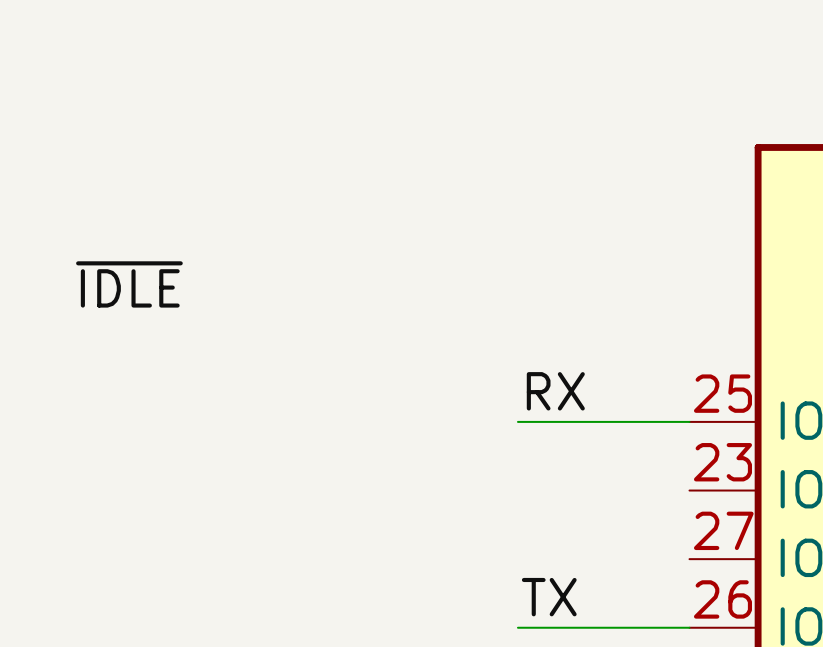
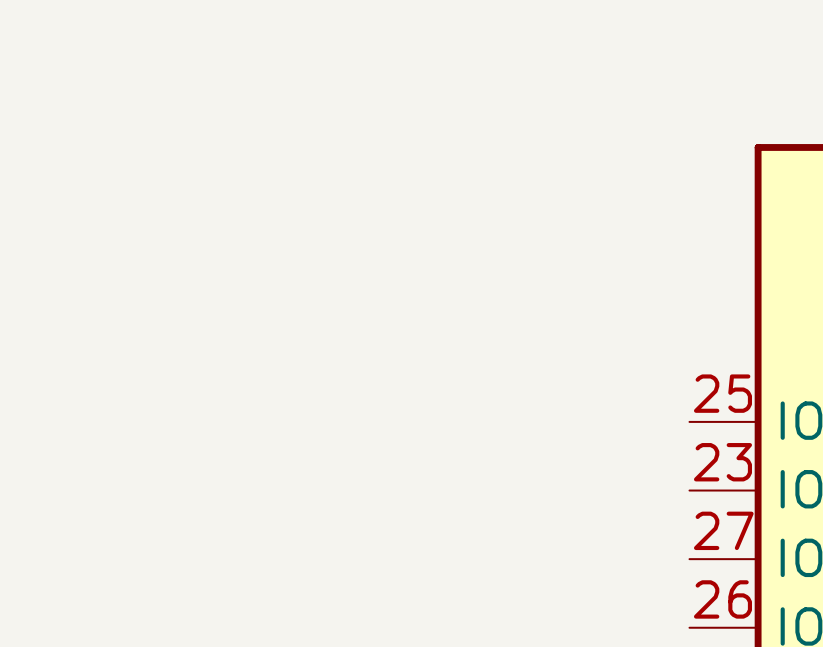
label: ~{IDLE} (129, 284) -> none
label: RX (555, 391) -> none
wire: (517, 421) (689, 421) -> none
label: TX (549, 597) -> none
wire: (517, 627) (689, 627) -> none

